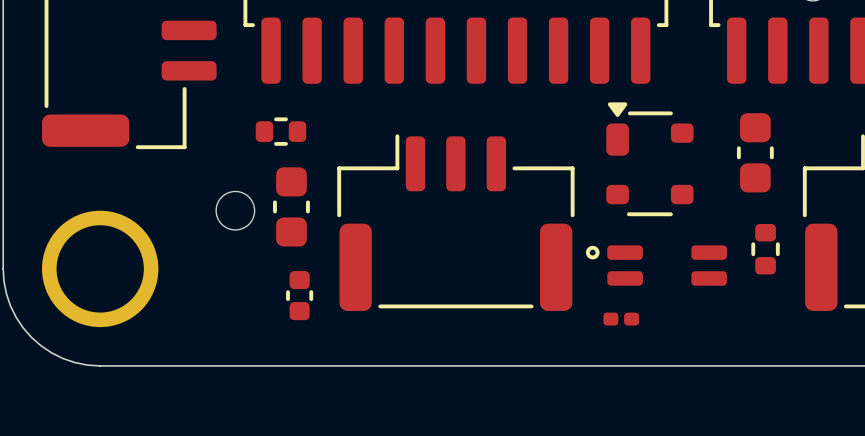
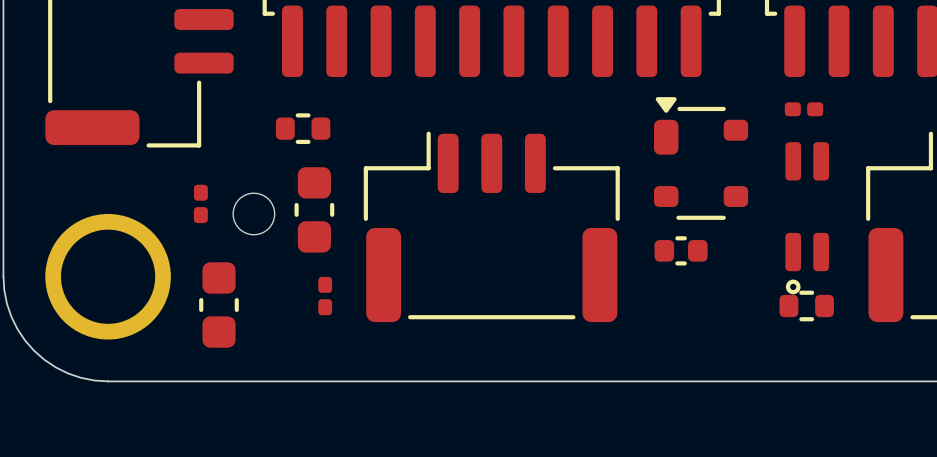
part: none -> (804, 109)
part position: (755, 152) -> (219, 305)
part: none -> (200, 203)
part: none -> (681, 250)
part rotation: 0° (765, 249) -> 90° clockwise (806, 305)
part position: (765, 249) -> (806, 305)
part rotation: 0° (656, 265) -> 90° counterclockwise (807, 218)
part position: (656, 265) -> (807, 218)
part footprint: [286, 271, 314, 321] -> [318, 276, 333, 316]
part: (621, 319) -> none

